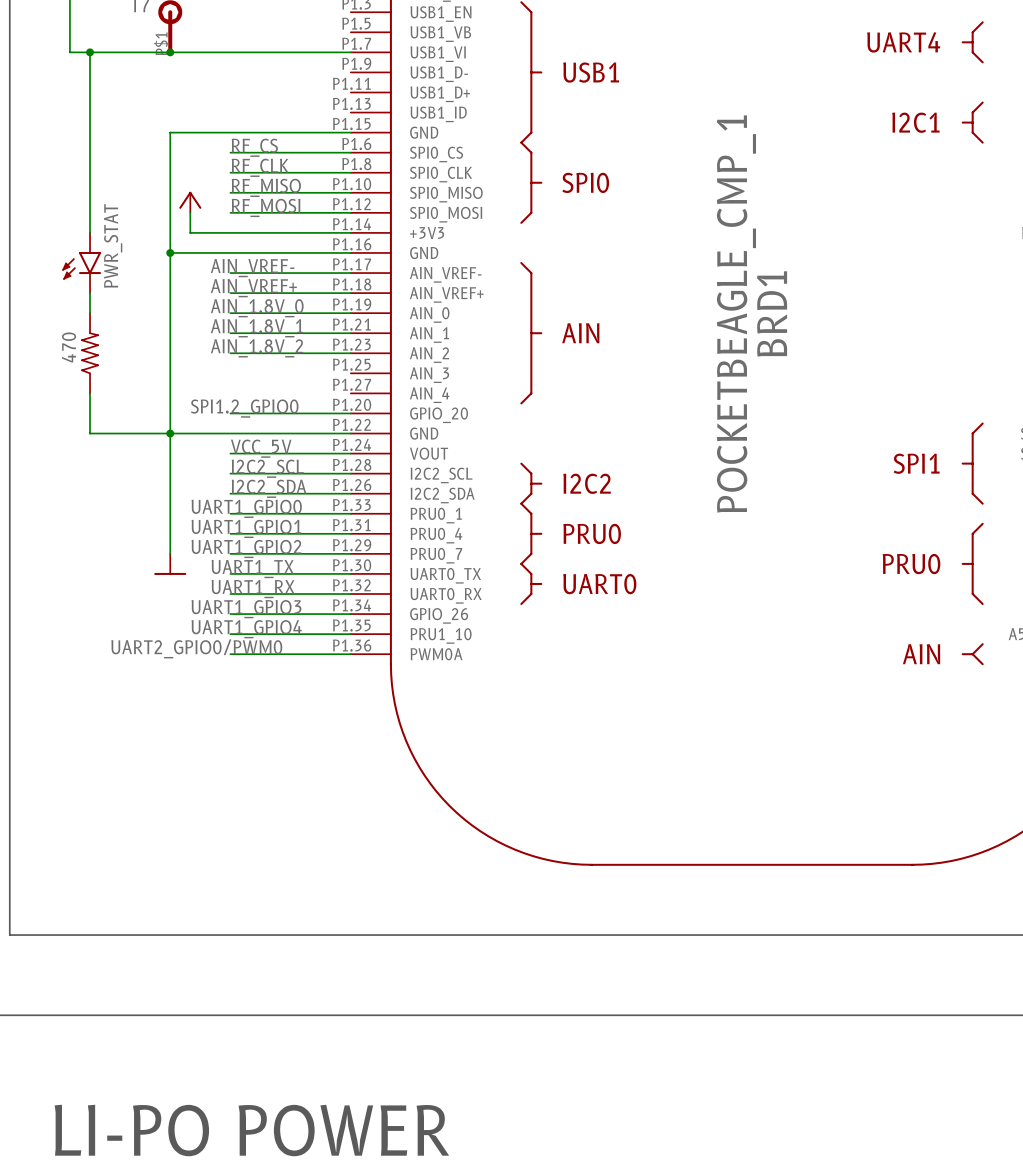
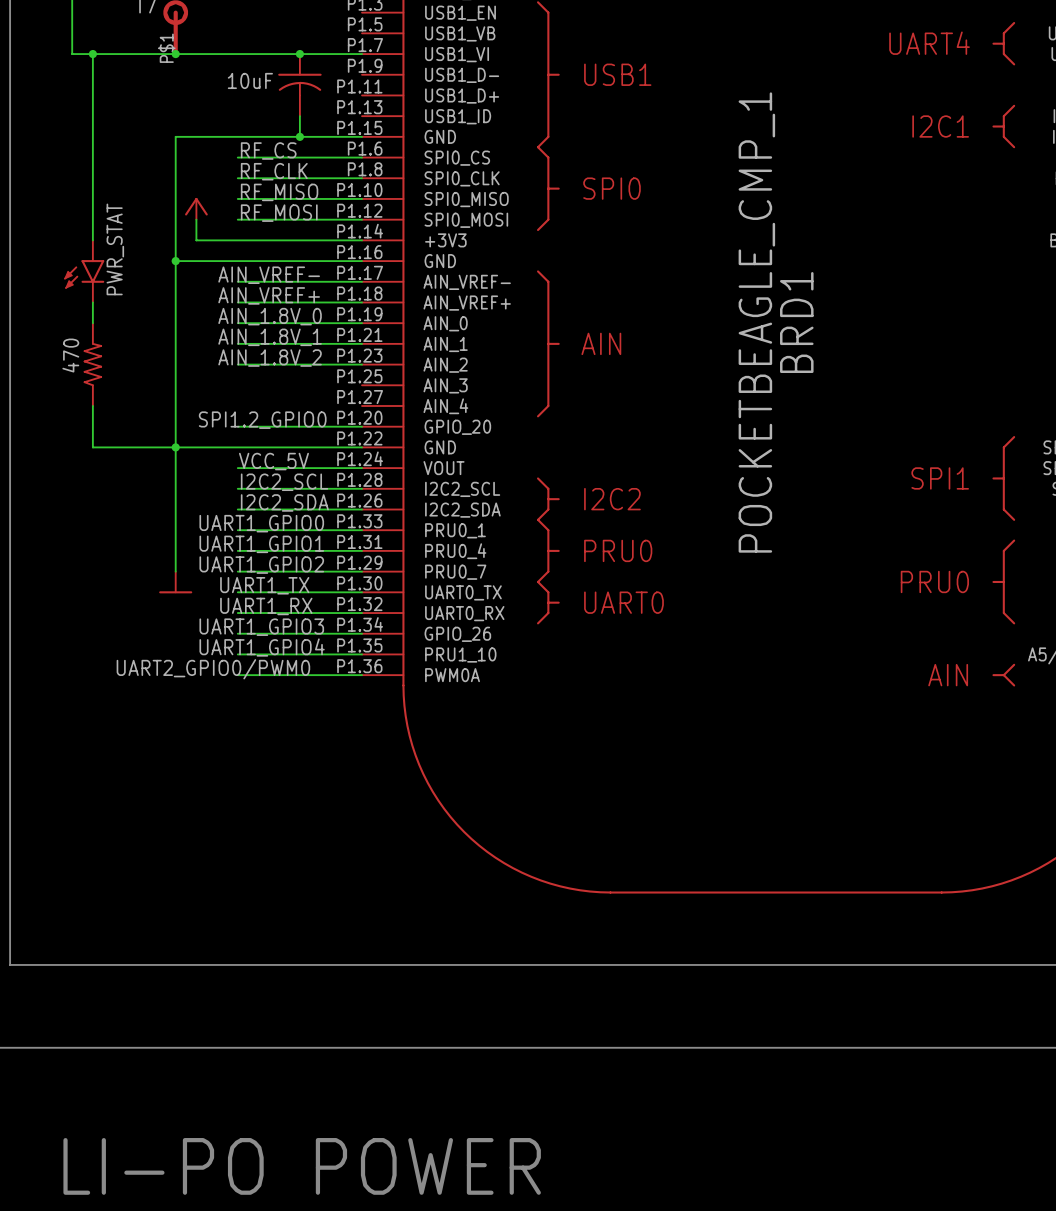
junction: none -> (299, 54)
part: none -> 10uF (299, 85)
wire: none -> (299, 116) (299, 136)
junction: none -> (299, 136)

